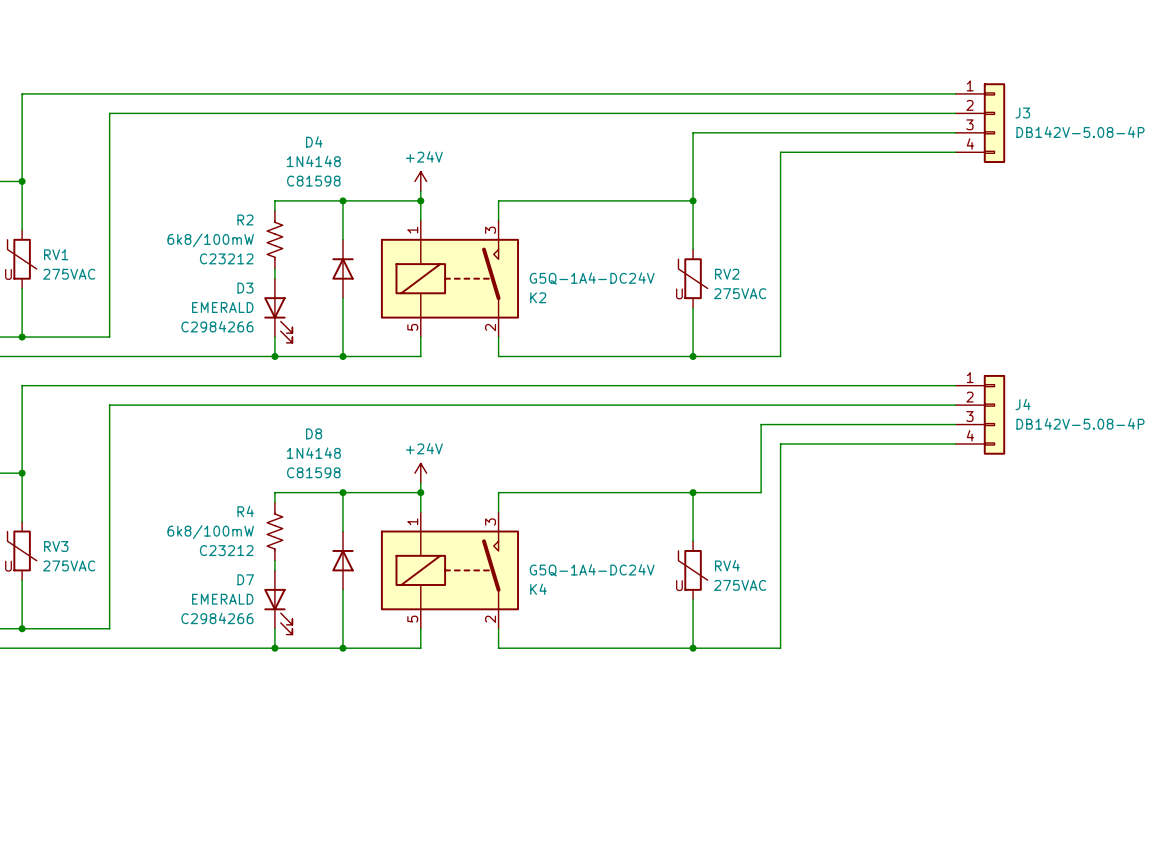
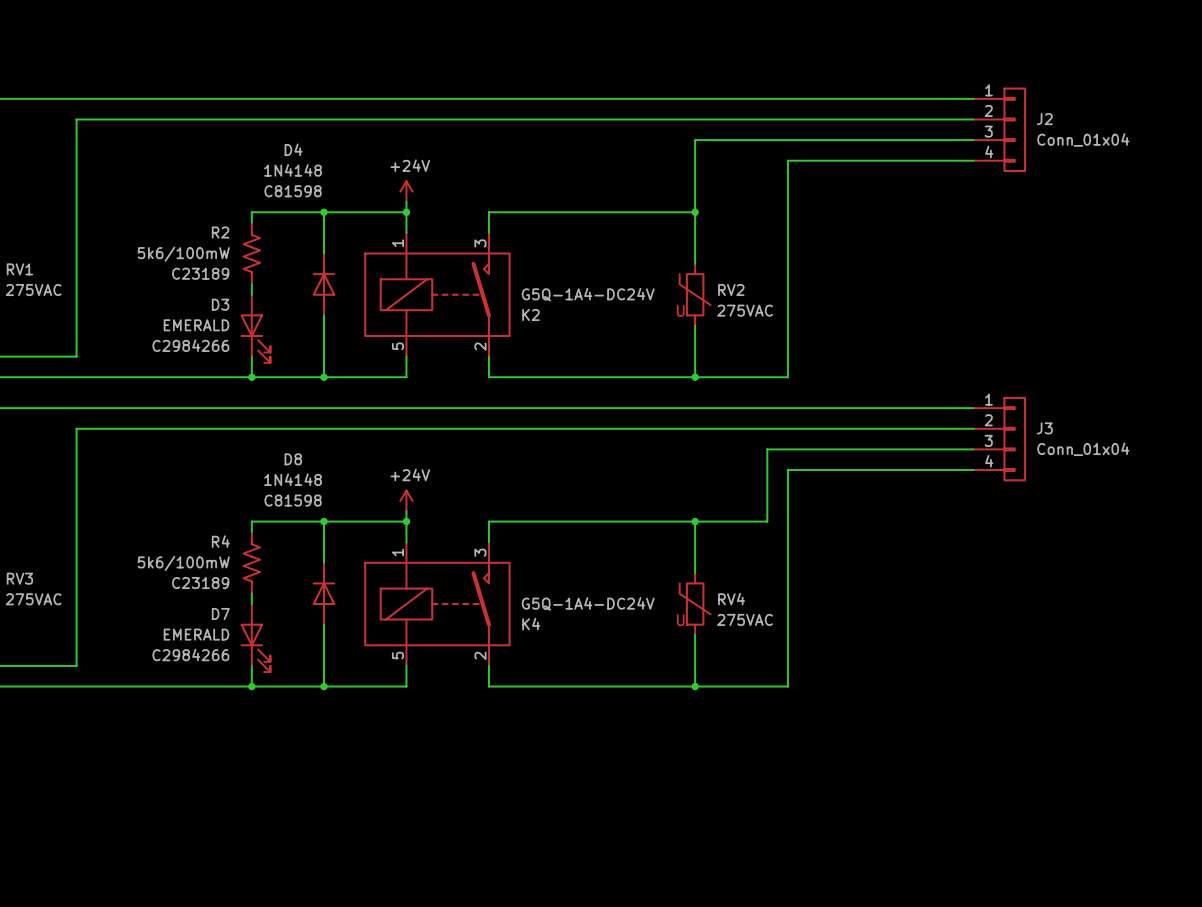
J3 name: J3 (1022, 113) -> J2 (1044, 119)
J3 value: DB142V-5.08-4P (1080, 132) -> Conn_01x04 (1083, 139)
R2 value: 6k8/100mW (210, 240) -> 5k6/100mW (183, 254)
R2 text: C23212 (226, 258) -> C23189 (200, 273)
J4 name: J4 (1023, 404) -> J3 (1044, 428)
J4 value: DB142V-5.08-4P (1080, 423) -> Conn_01x04 (1083, 449)
R4 value: 6k8/100mW (210, 532) -> 5k6/100mW (183, 563)
R4 text: C23212 (226, 550) -> C23189 (200, 583)

